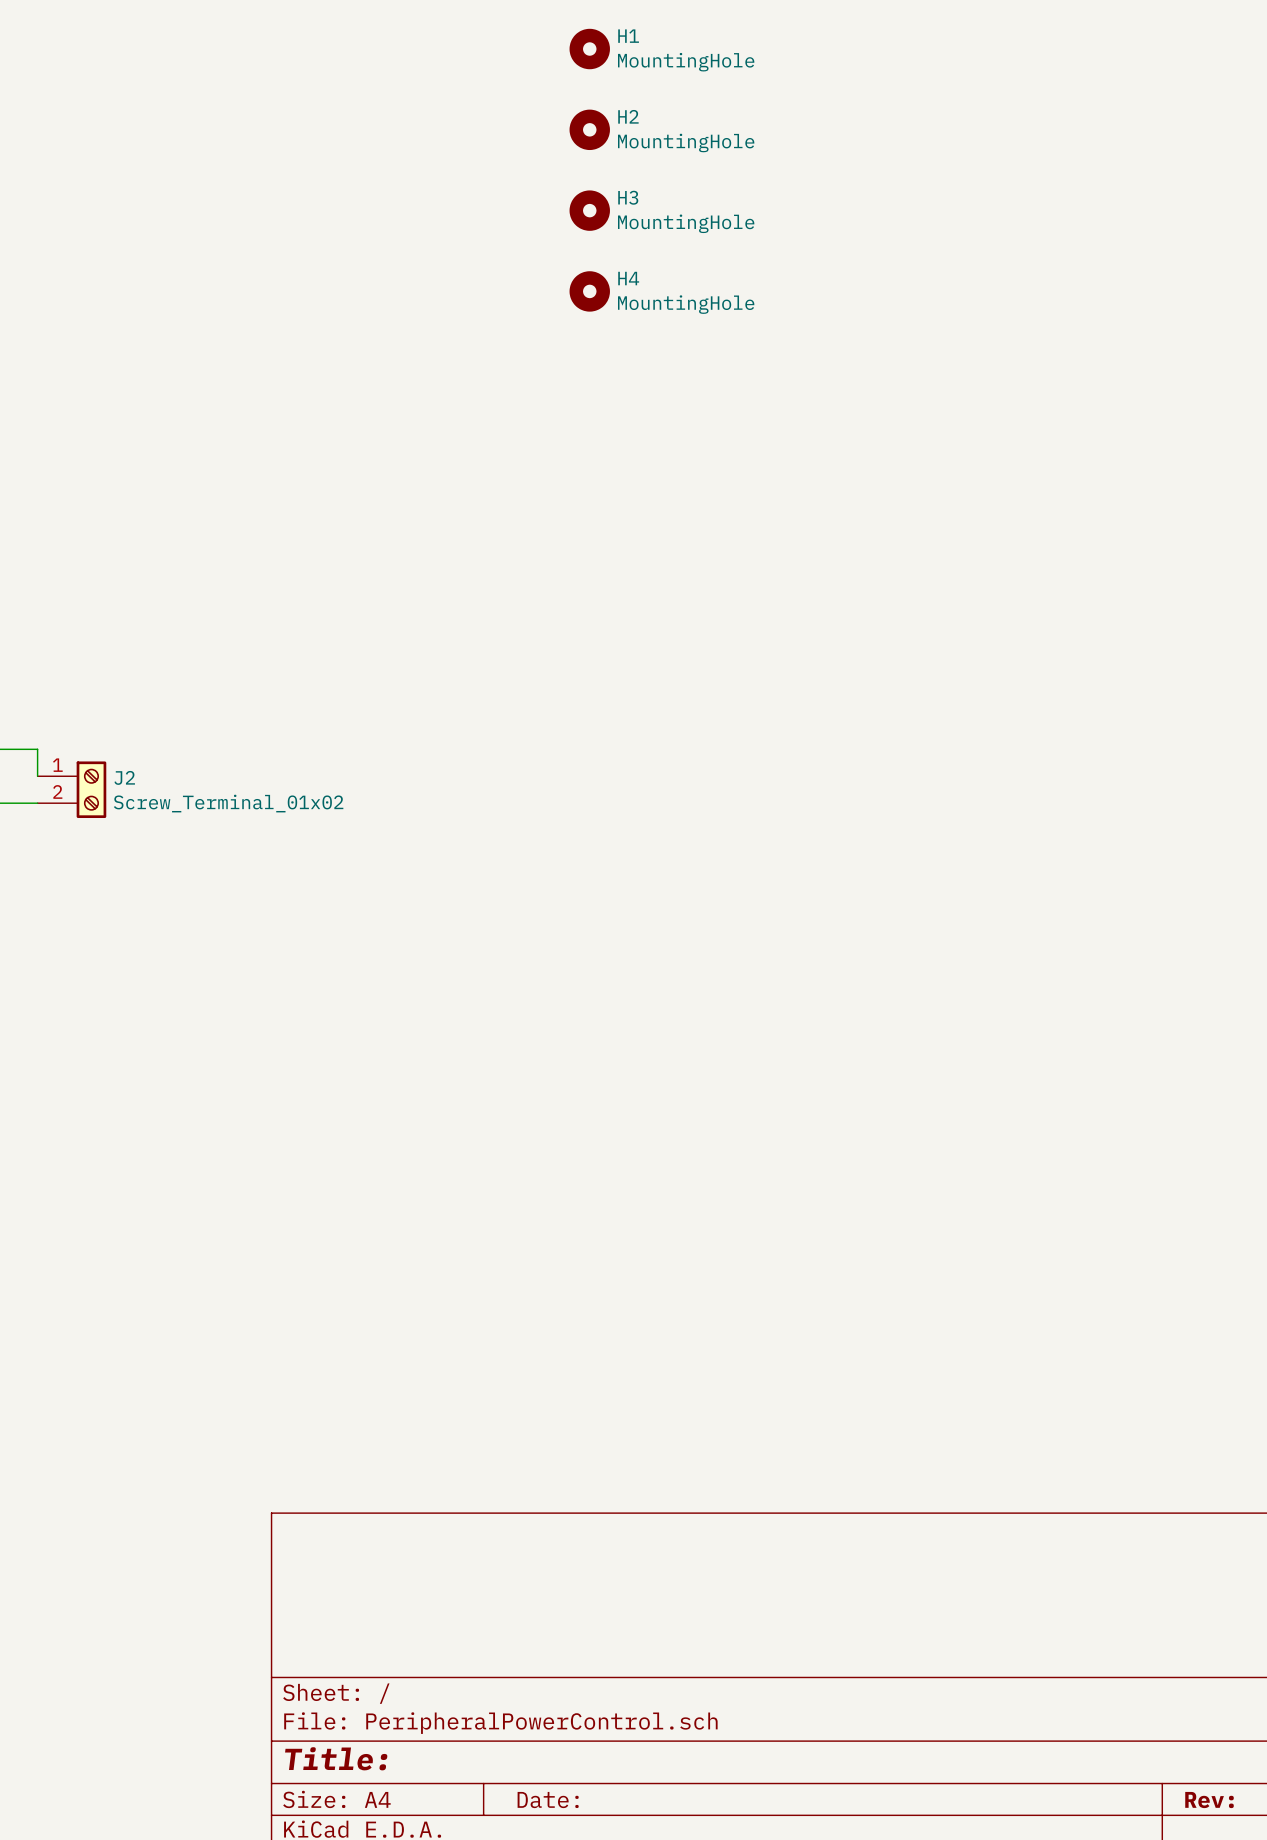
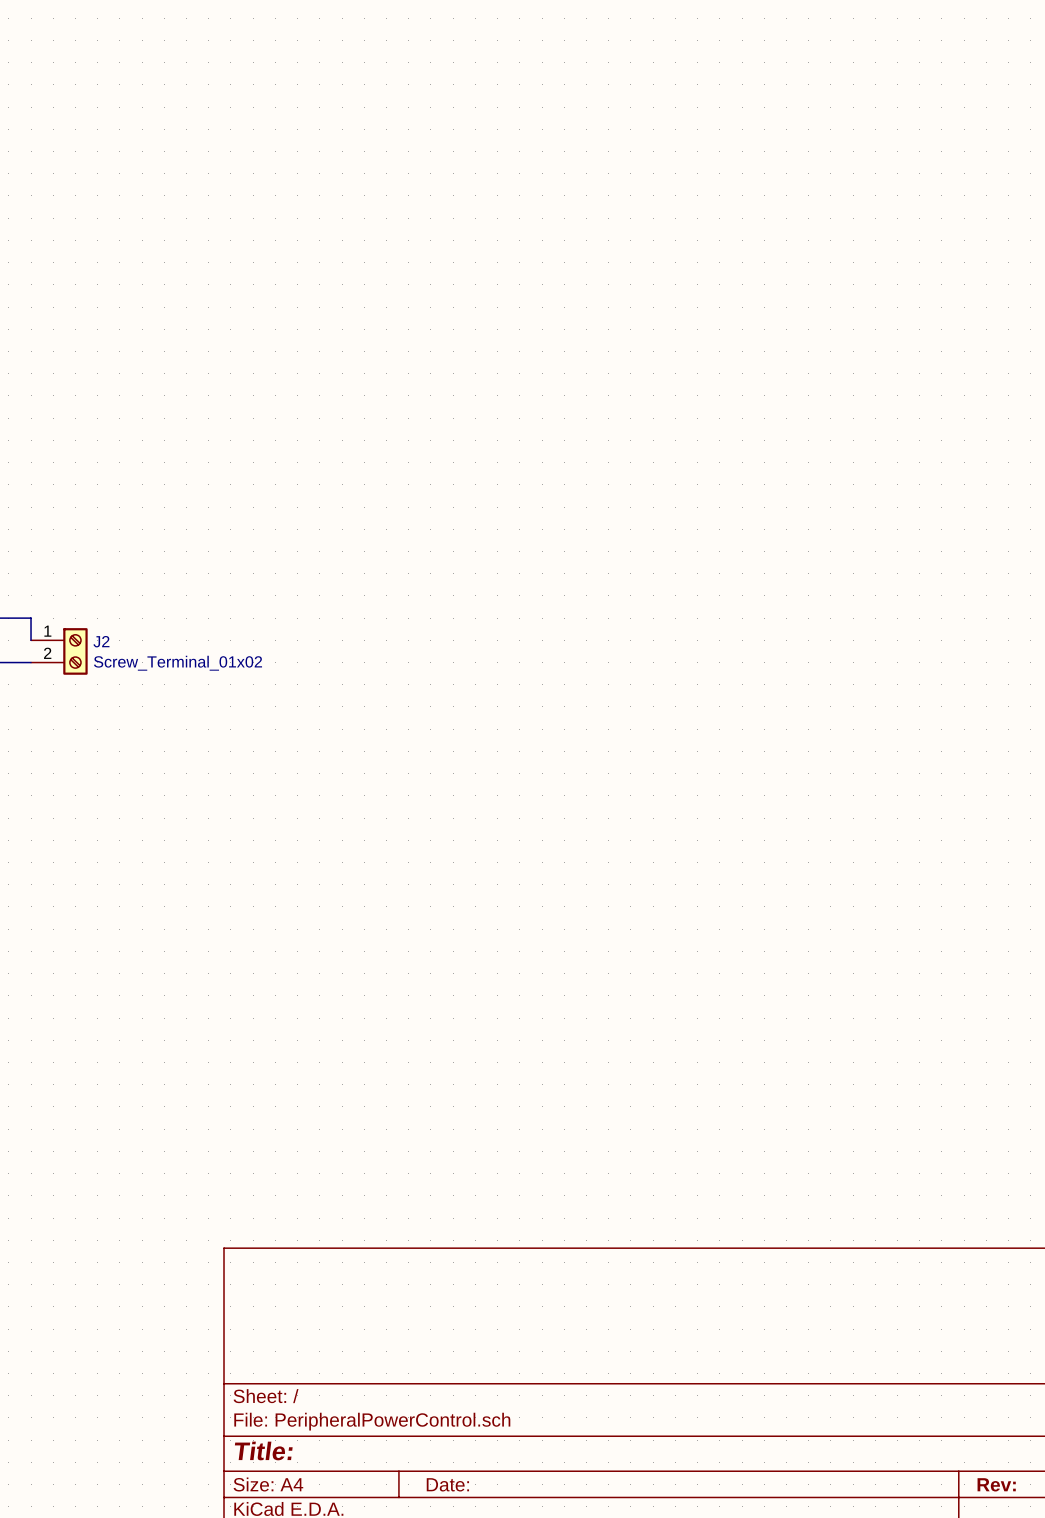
H1: MountingHole (589, 49) -> none
H2: MountingHole (589, 129) -> none
H3: MountingHole (589, 210) -> none
H4: MountingHole (589, 291) -> none

